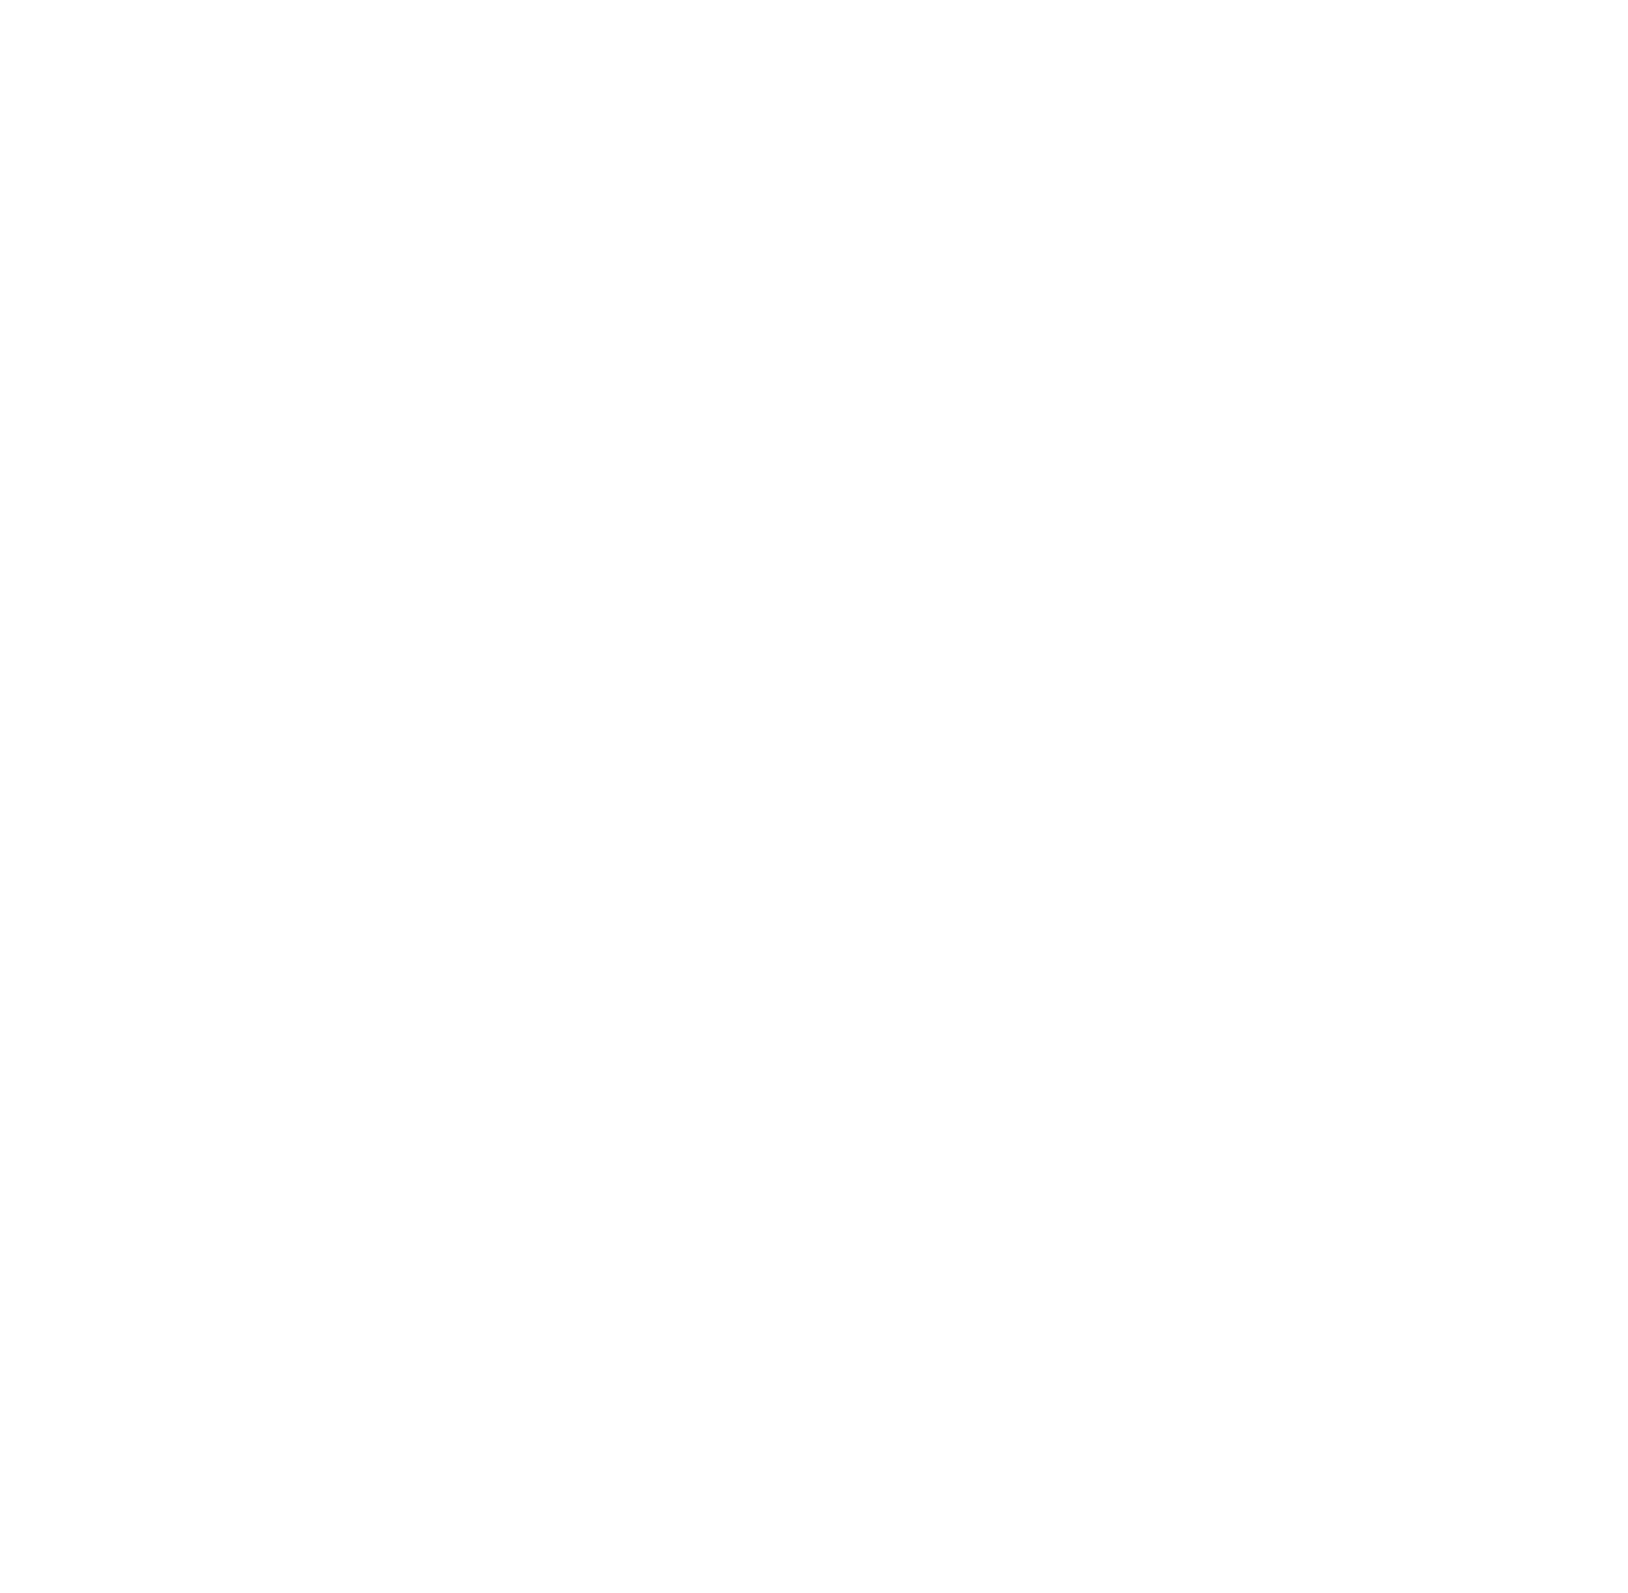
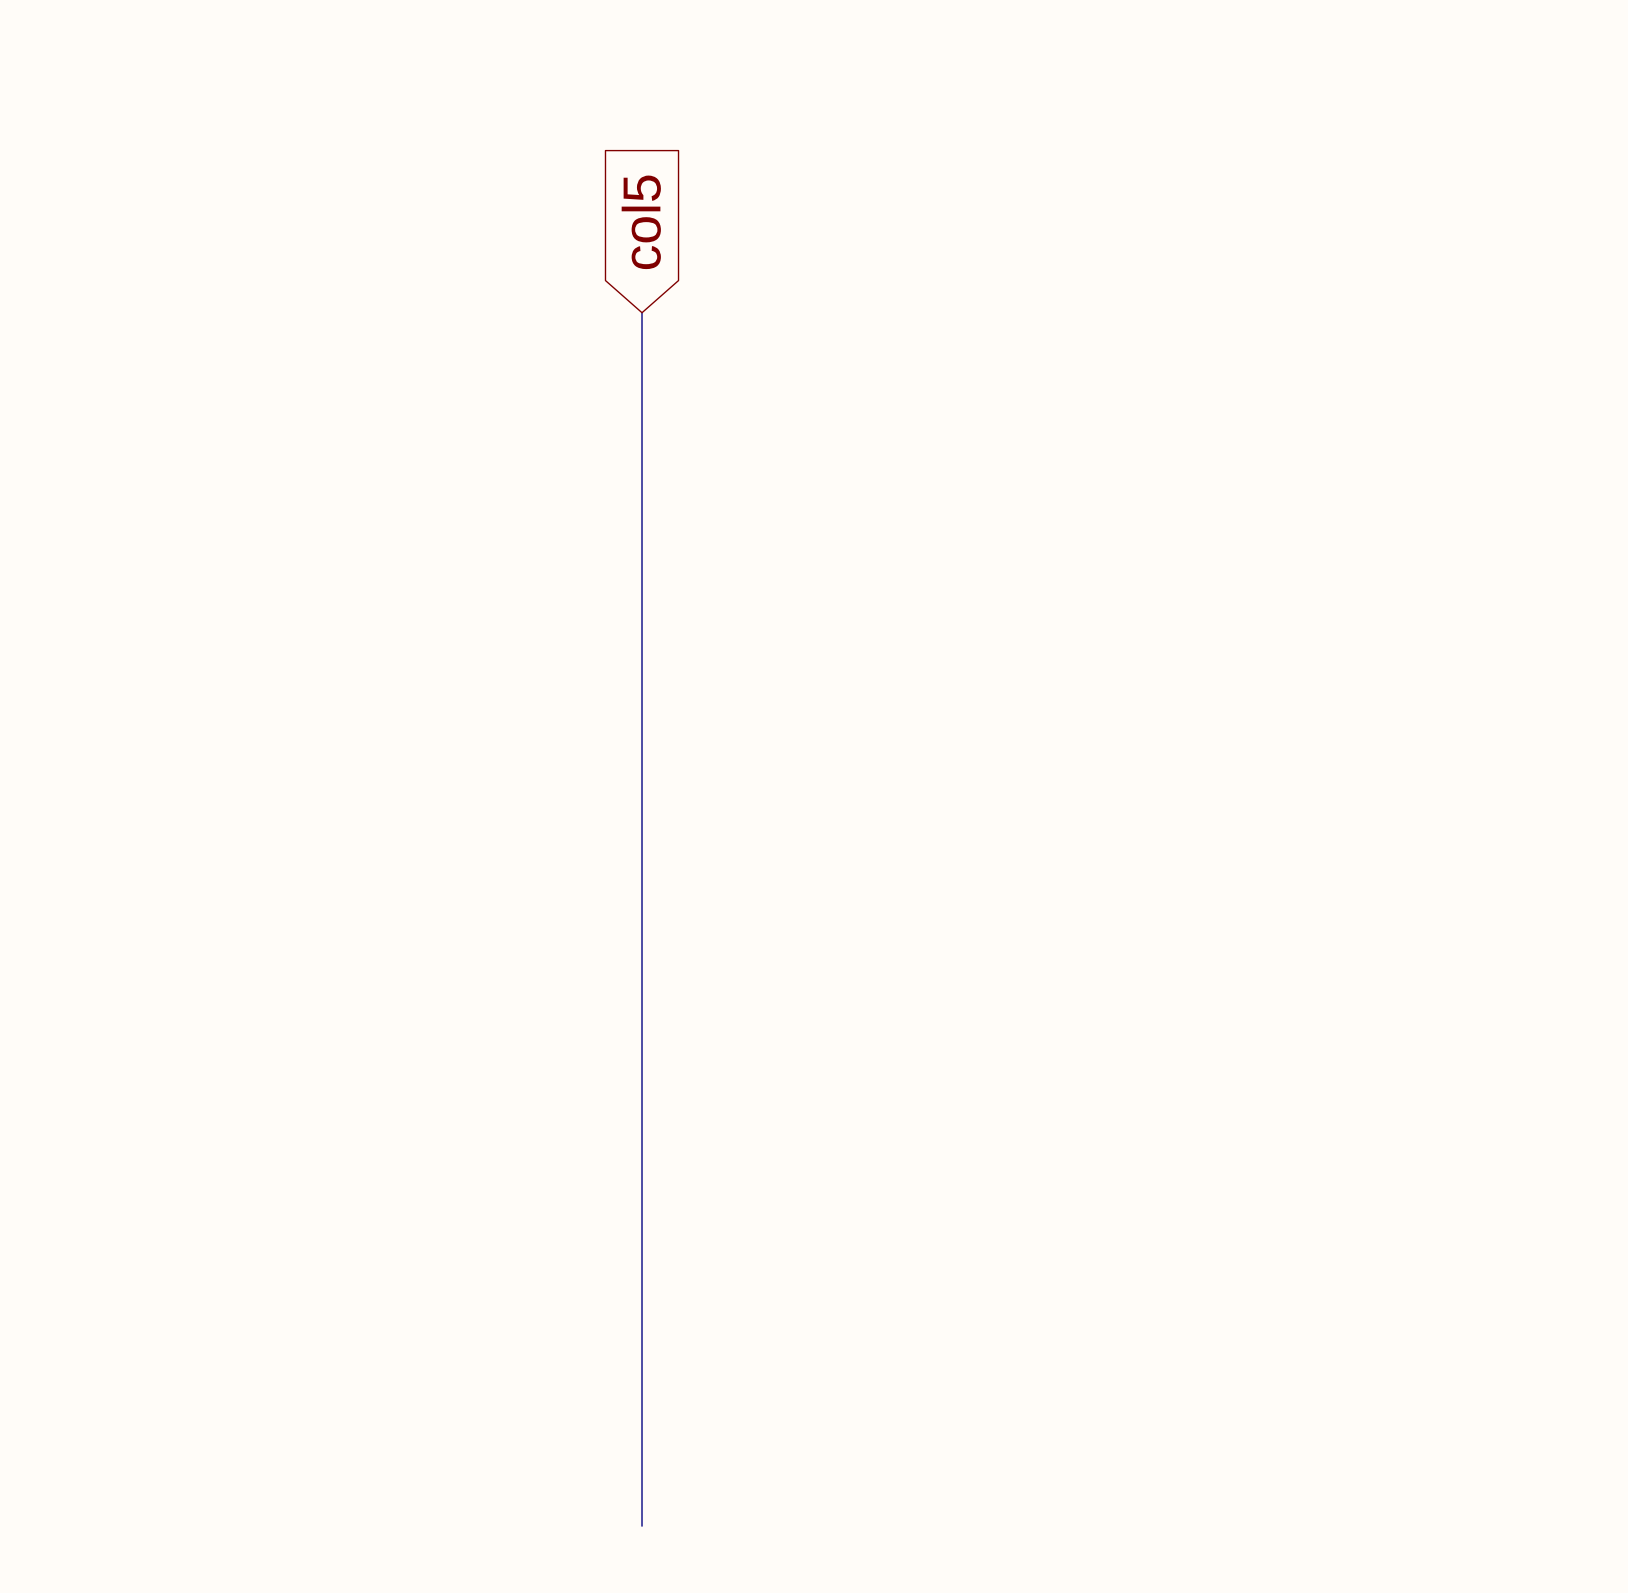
global label: none -> col5 (641, 222)
wire: none -> (642, 312) (642, 1526)

